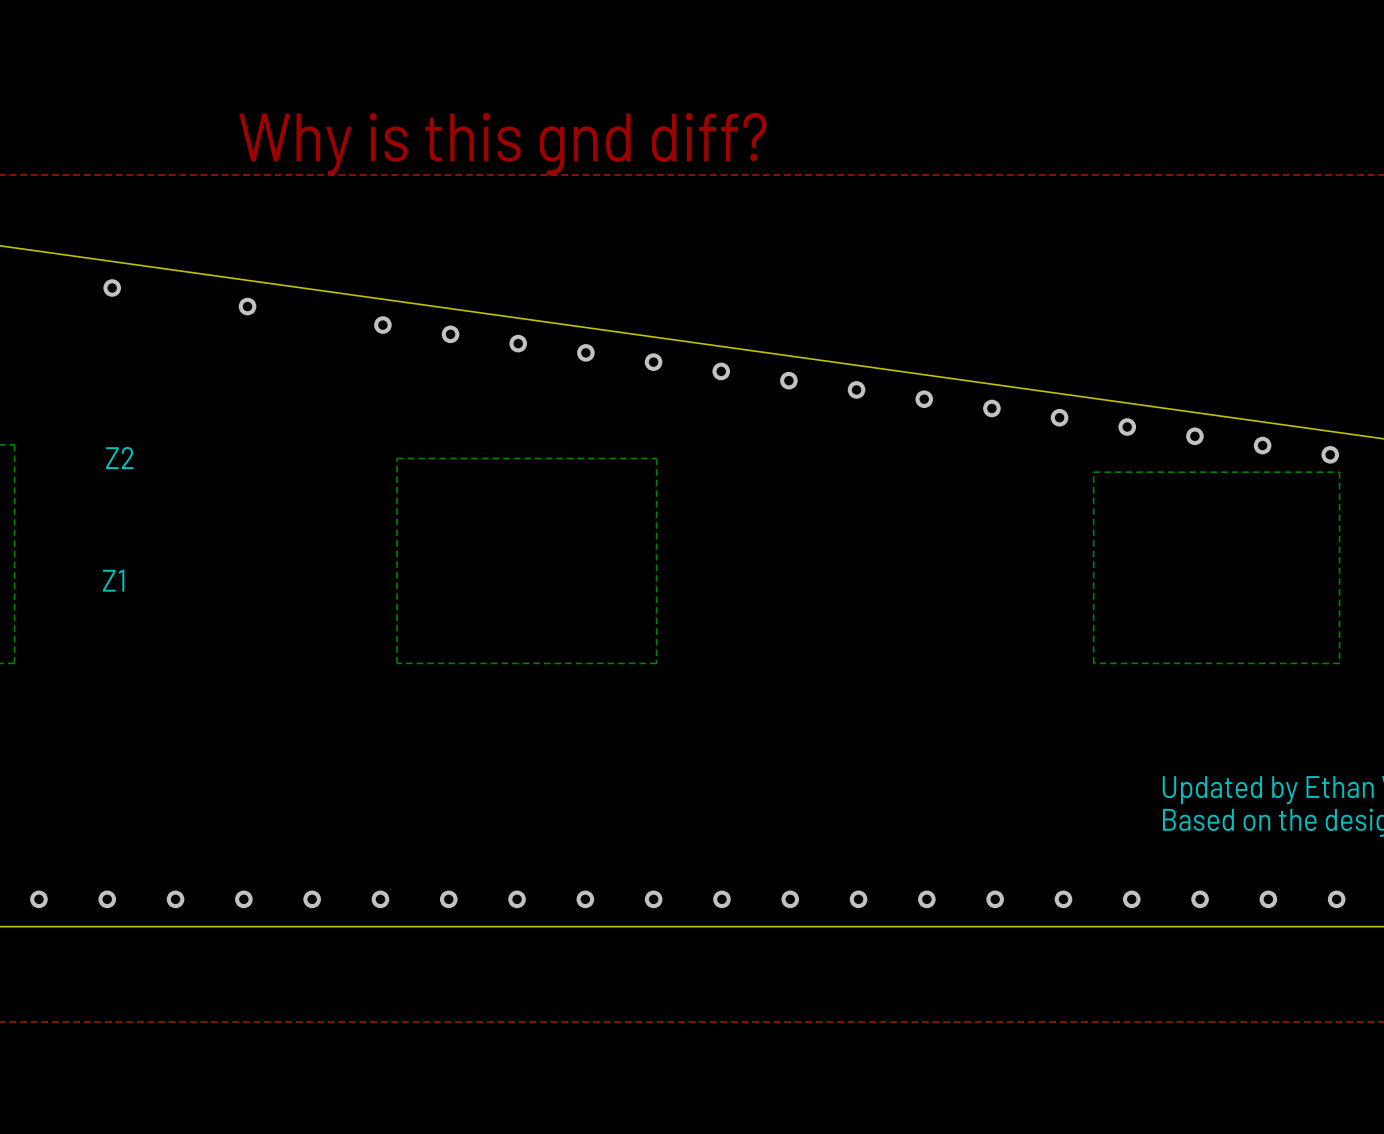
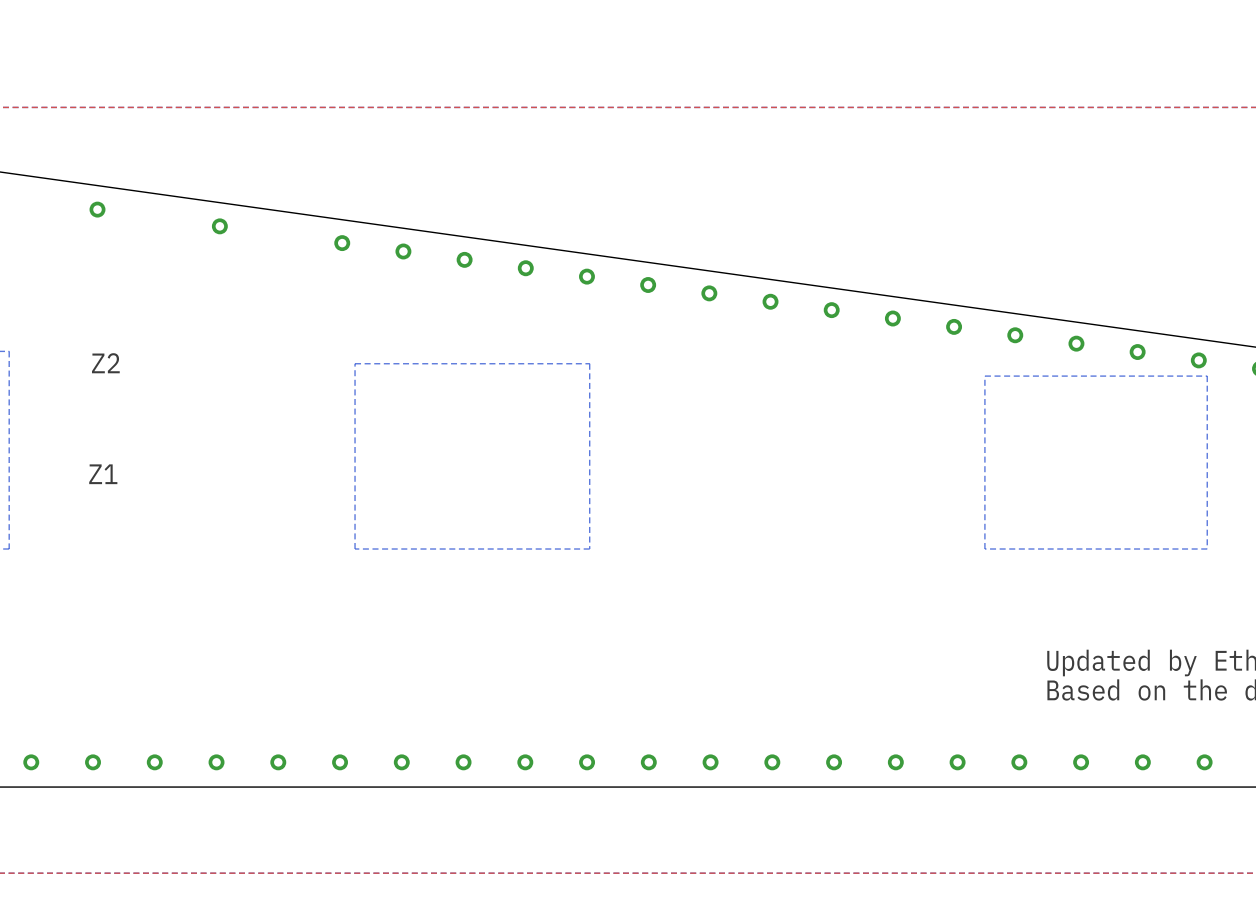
text: Why is this gnd diff? (502, 143) -> none

